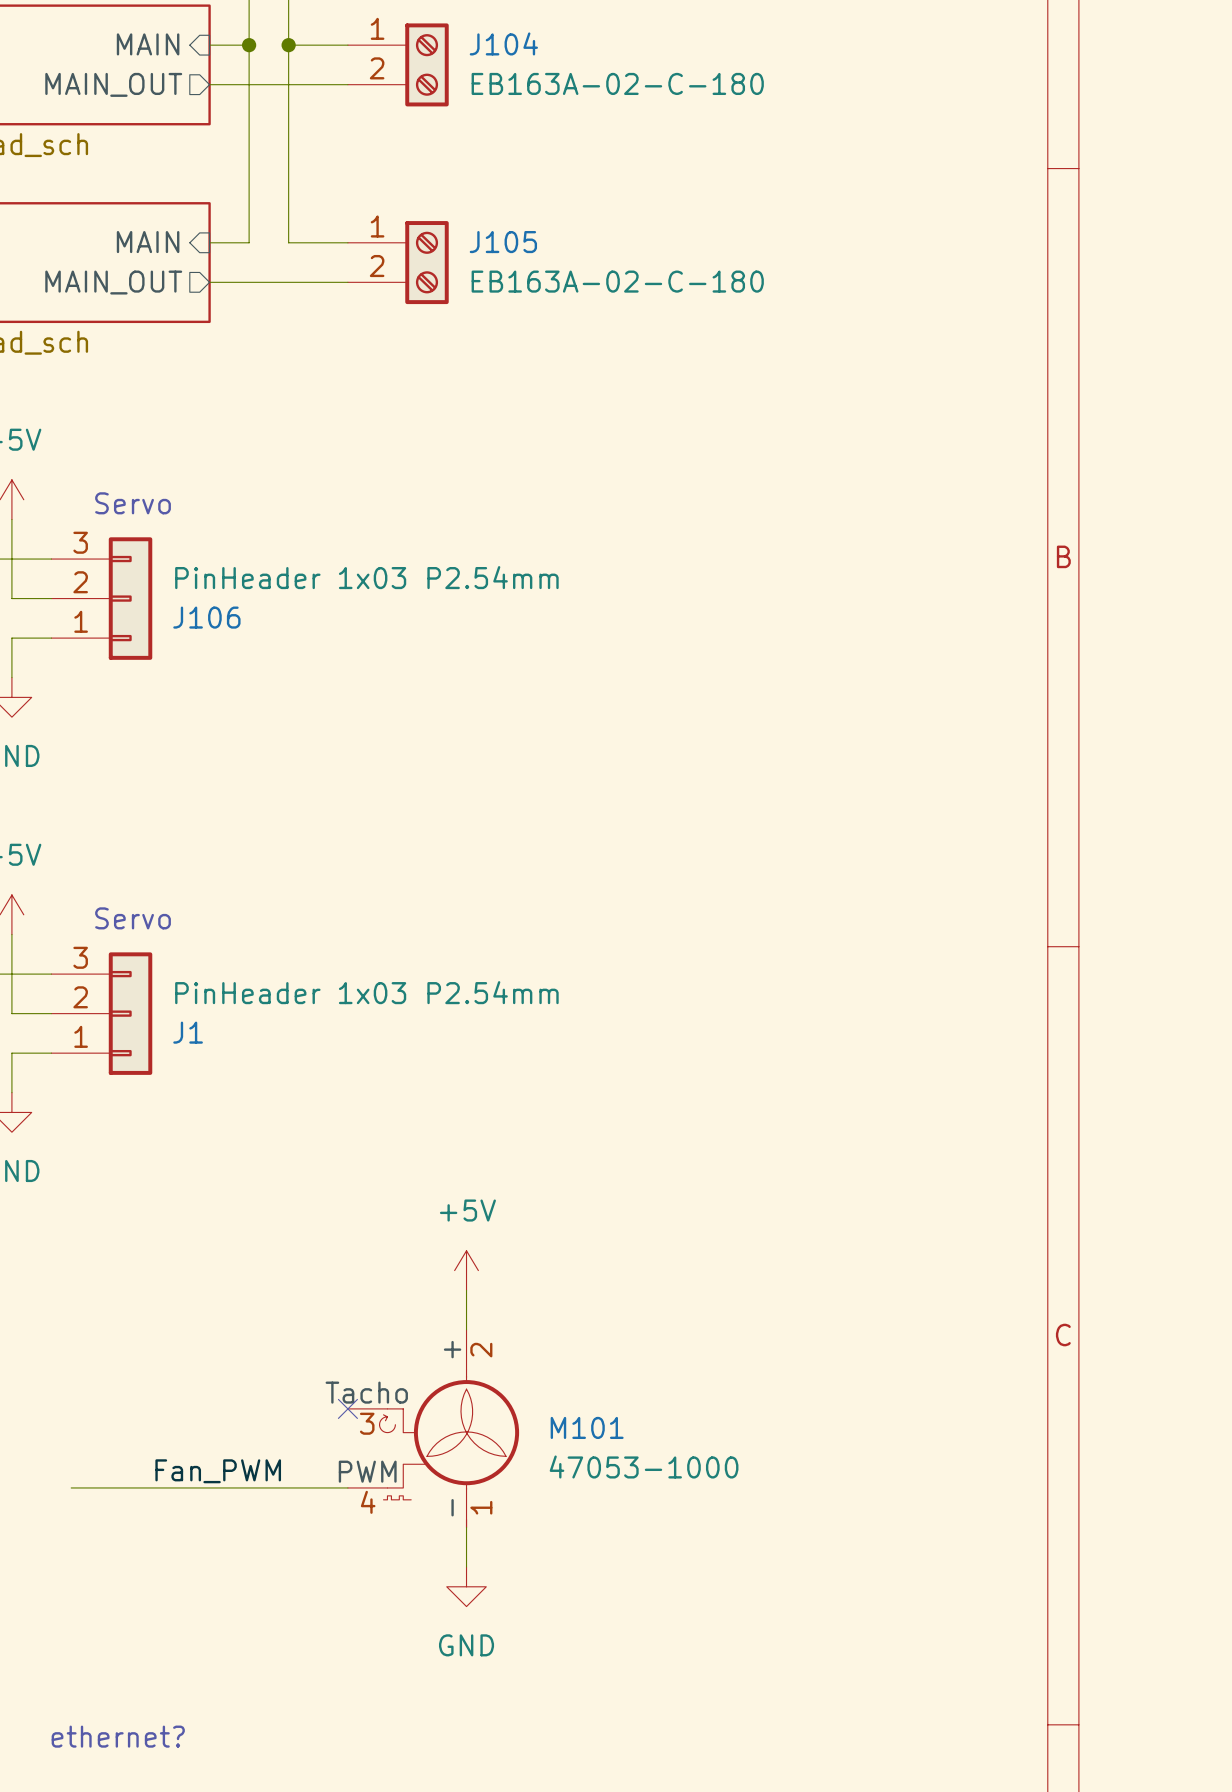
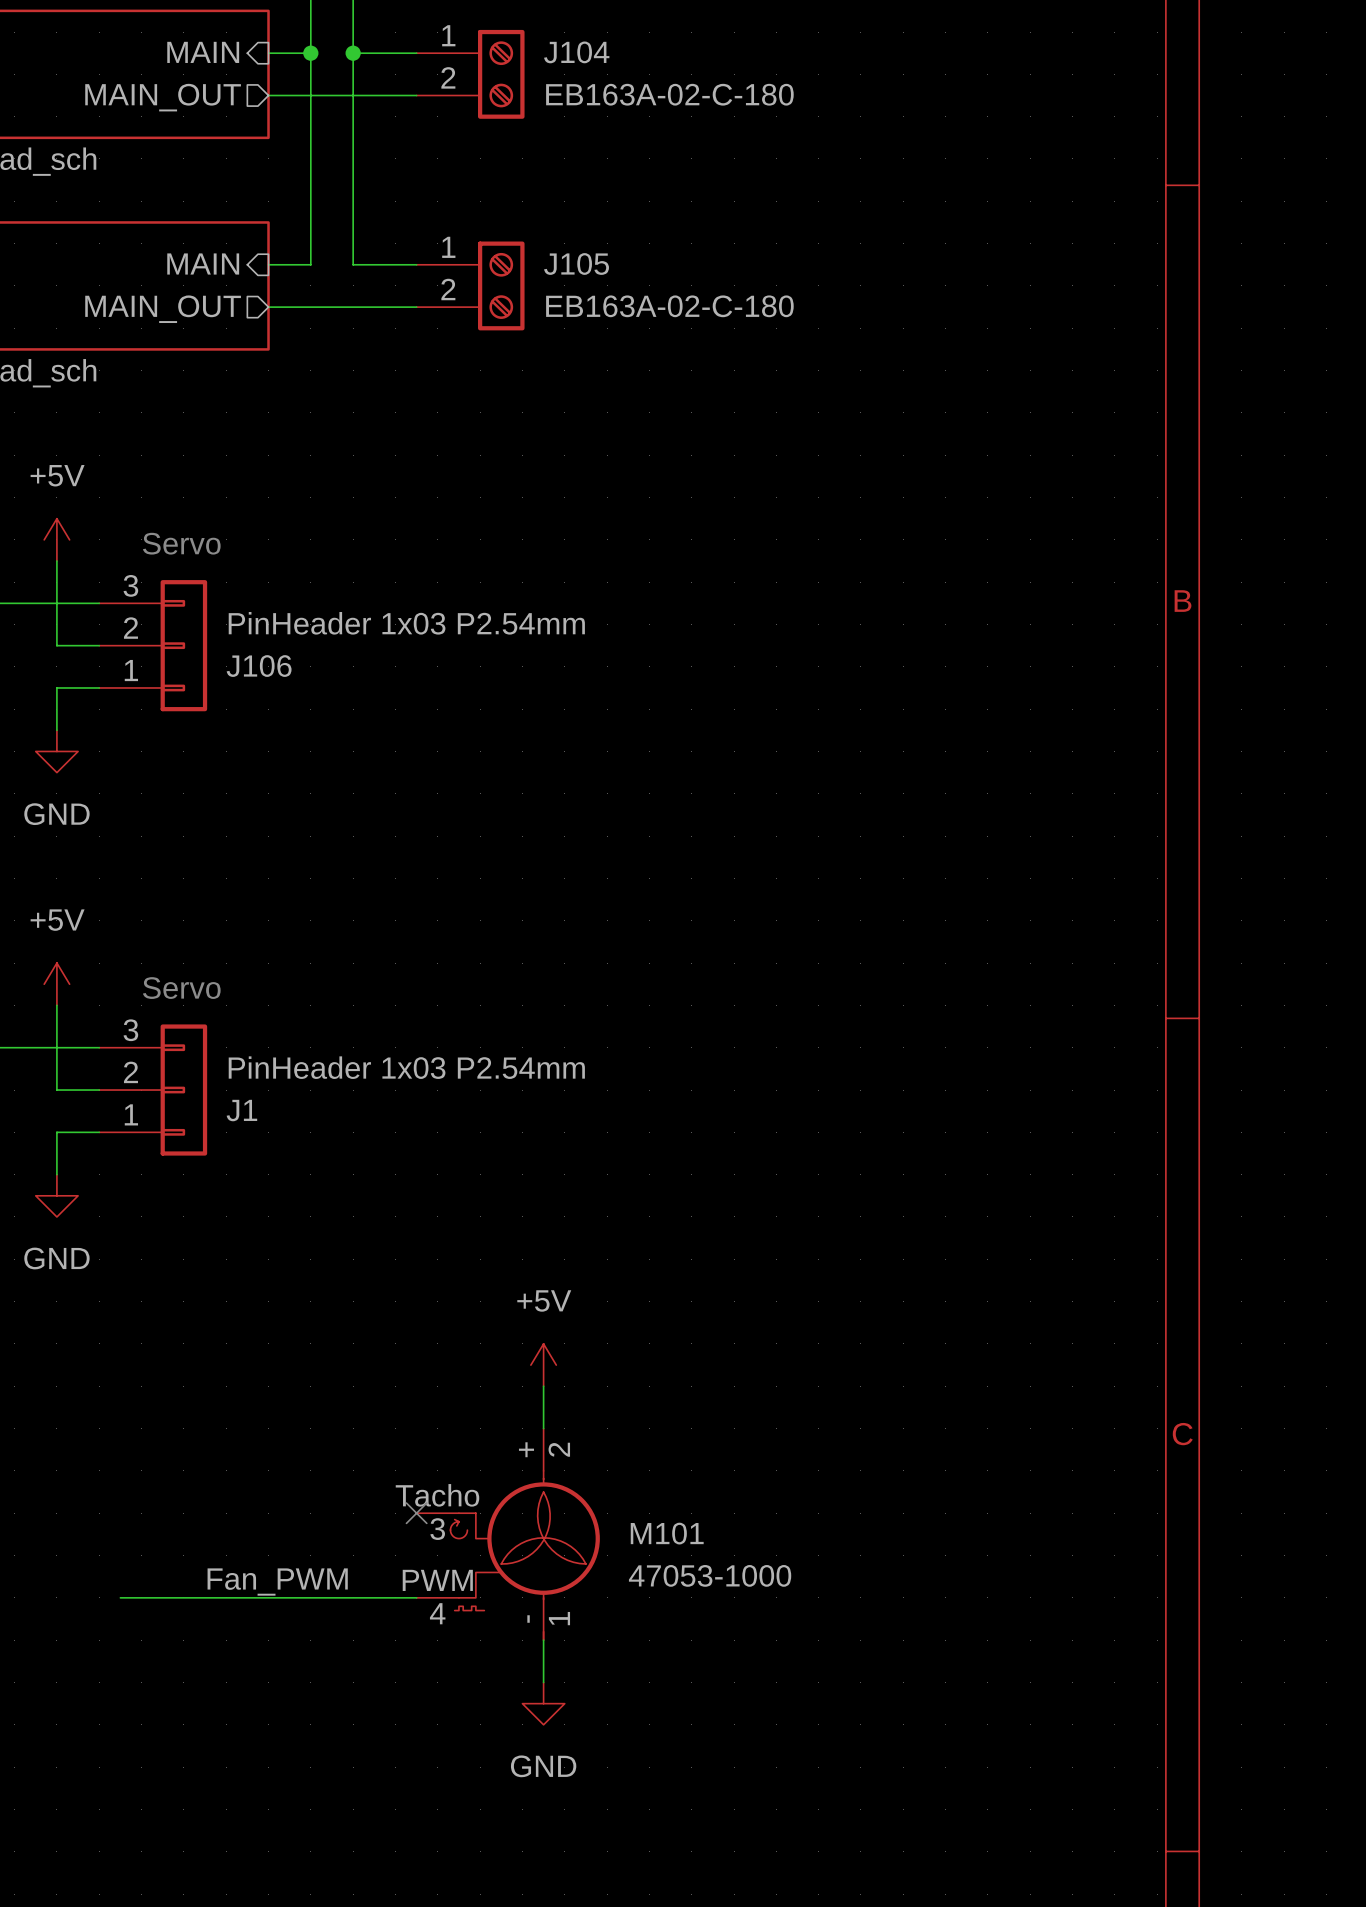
text: ethernet? (118, 1736) -> none

